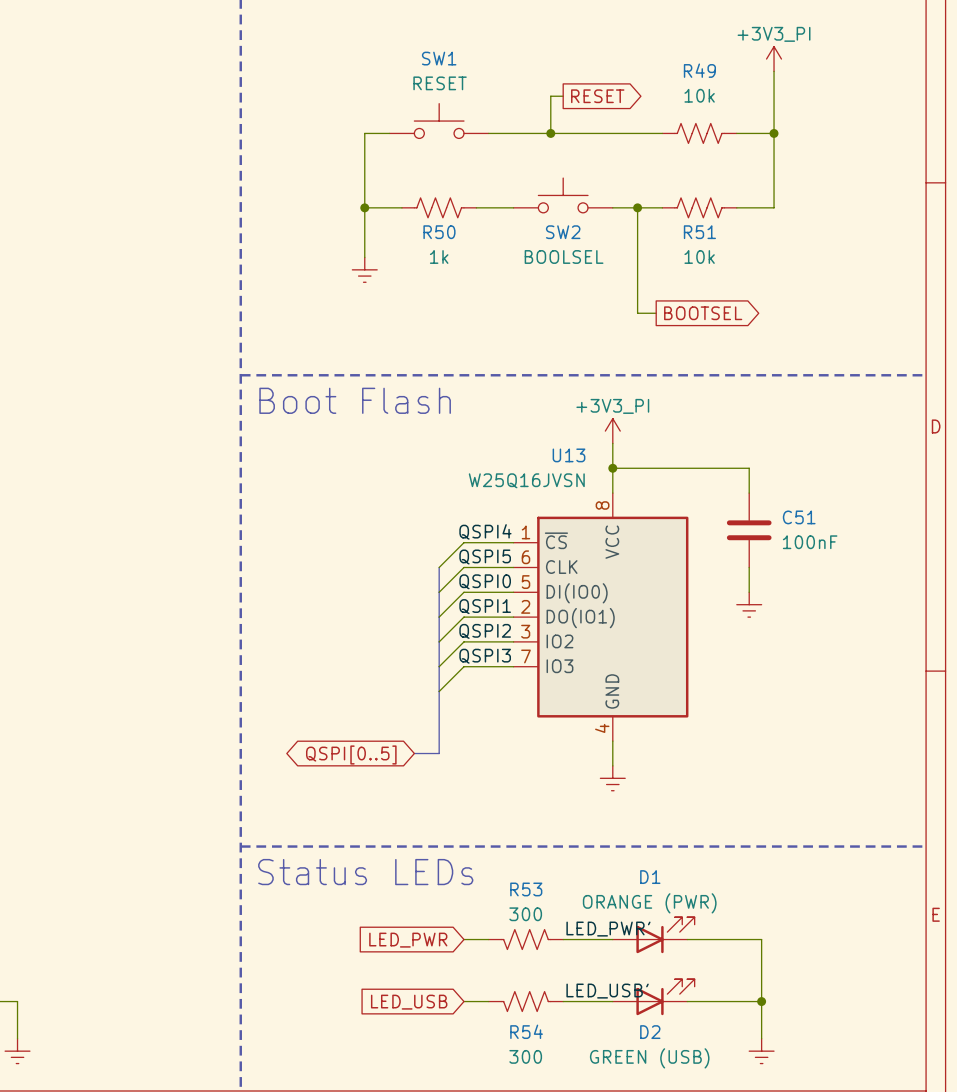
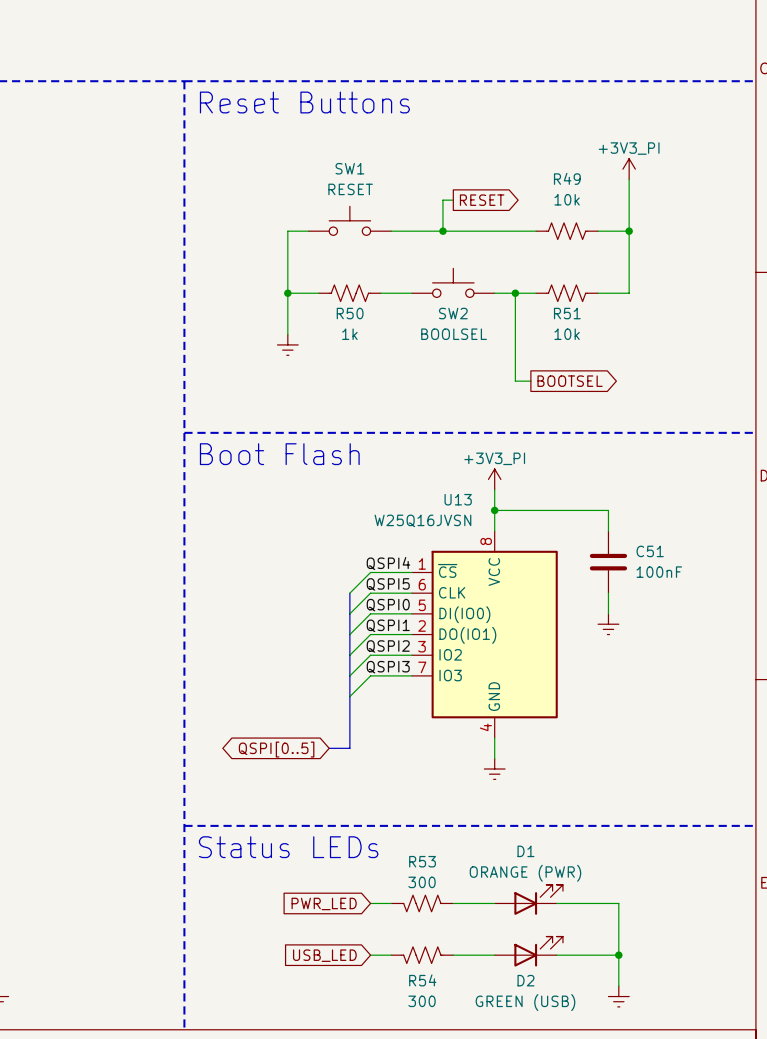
label: LED_PWR' (608, 929) -> none
global label: LED_PWR (408, 940) -> PWR_LED (324, 903)
label: LED_USB' (607, 991) -> none
global label: LED_USB (409, 1002) -> USB_LED (324, 955)

